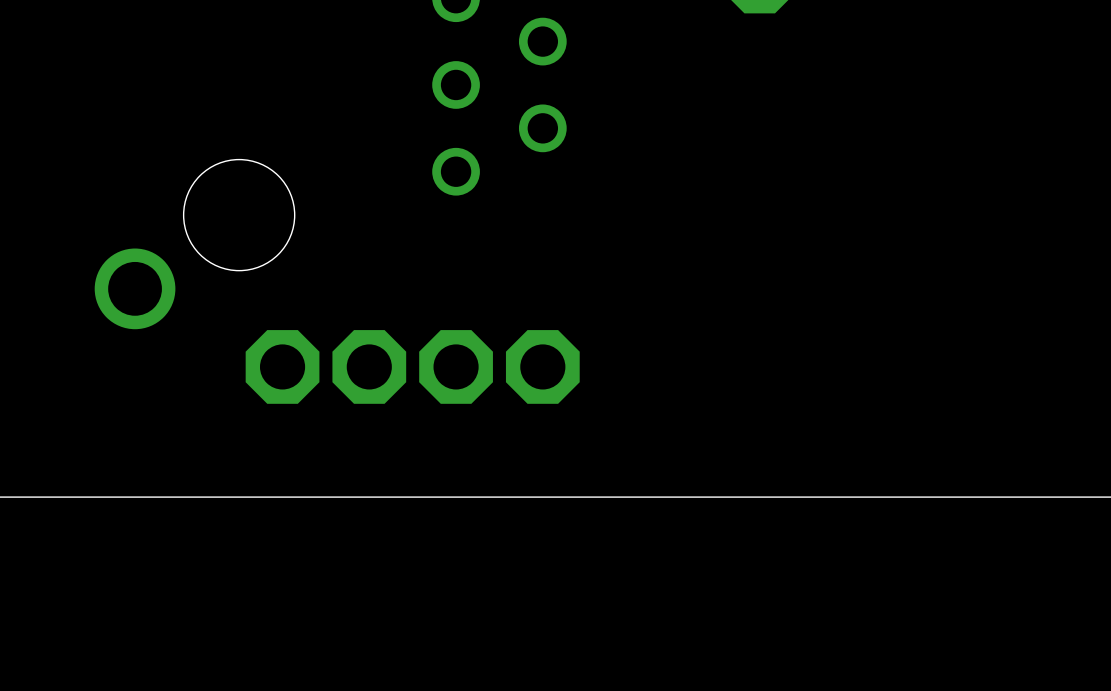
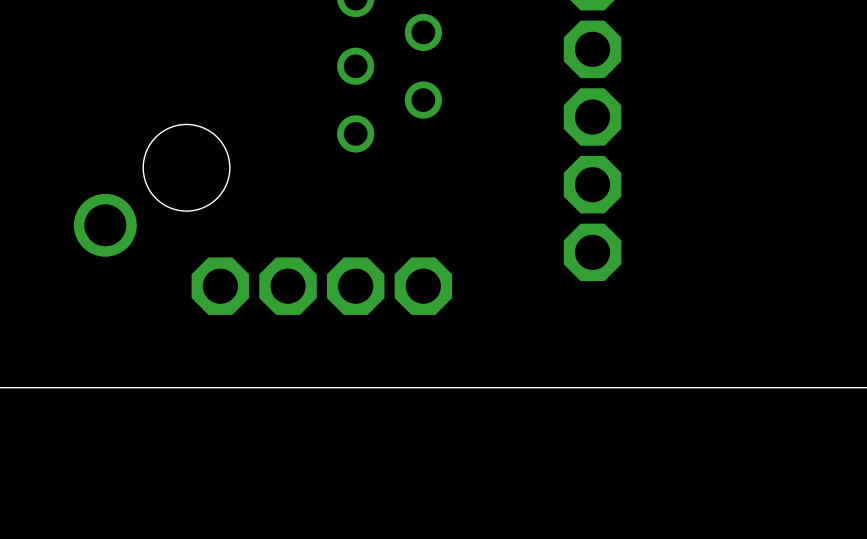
part: none -> (592, 49)
part: none -> (592, 117)
part: none -> (592, 184)
part: none -> (592, 252)

